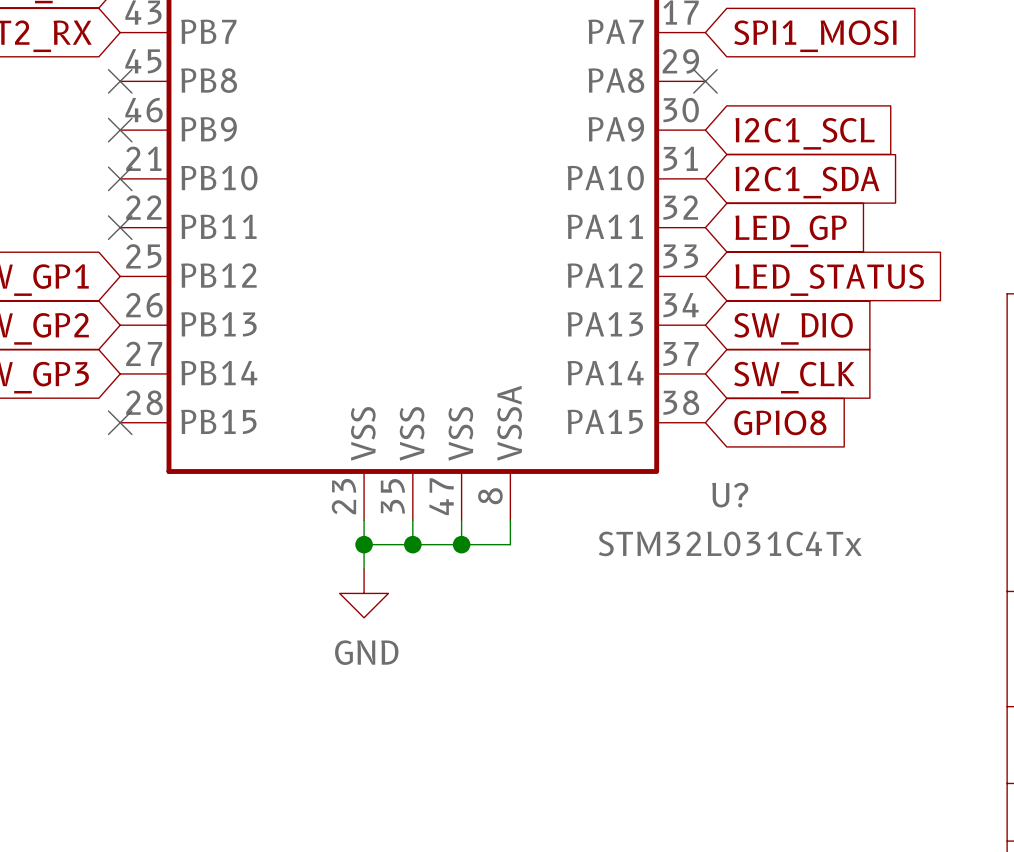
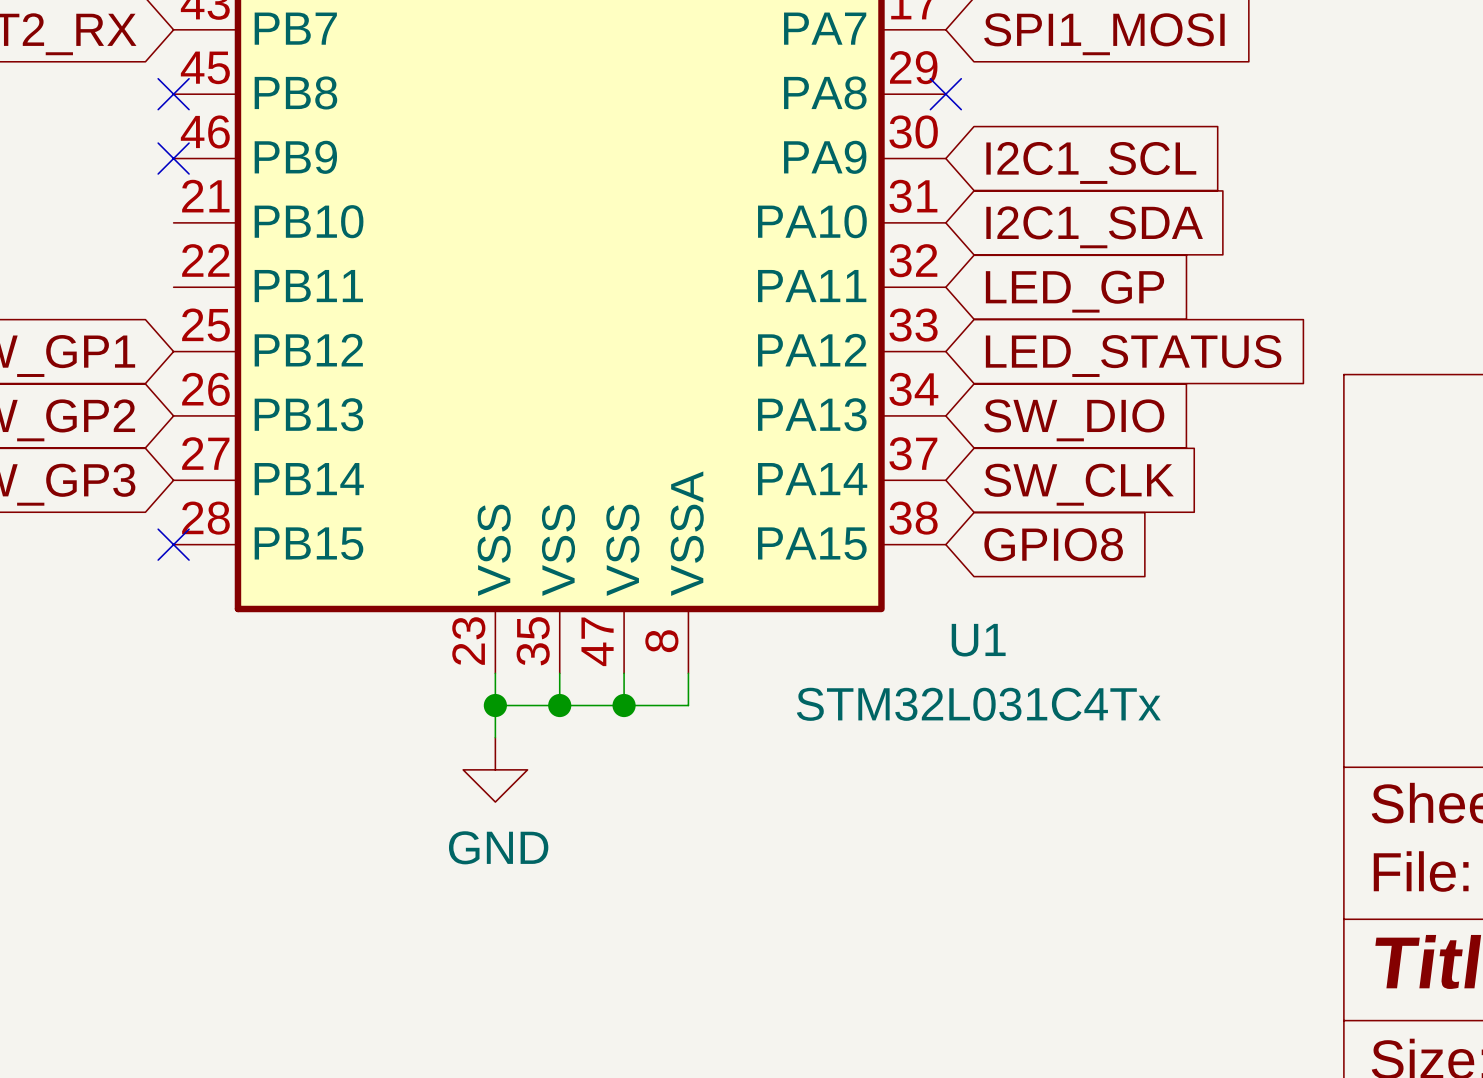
no-connect mark: (120, 178) -> none
no-connect mark: (120, 227) -> none
U? name: U? (730, 495) -> U1 (978, 640)

